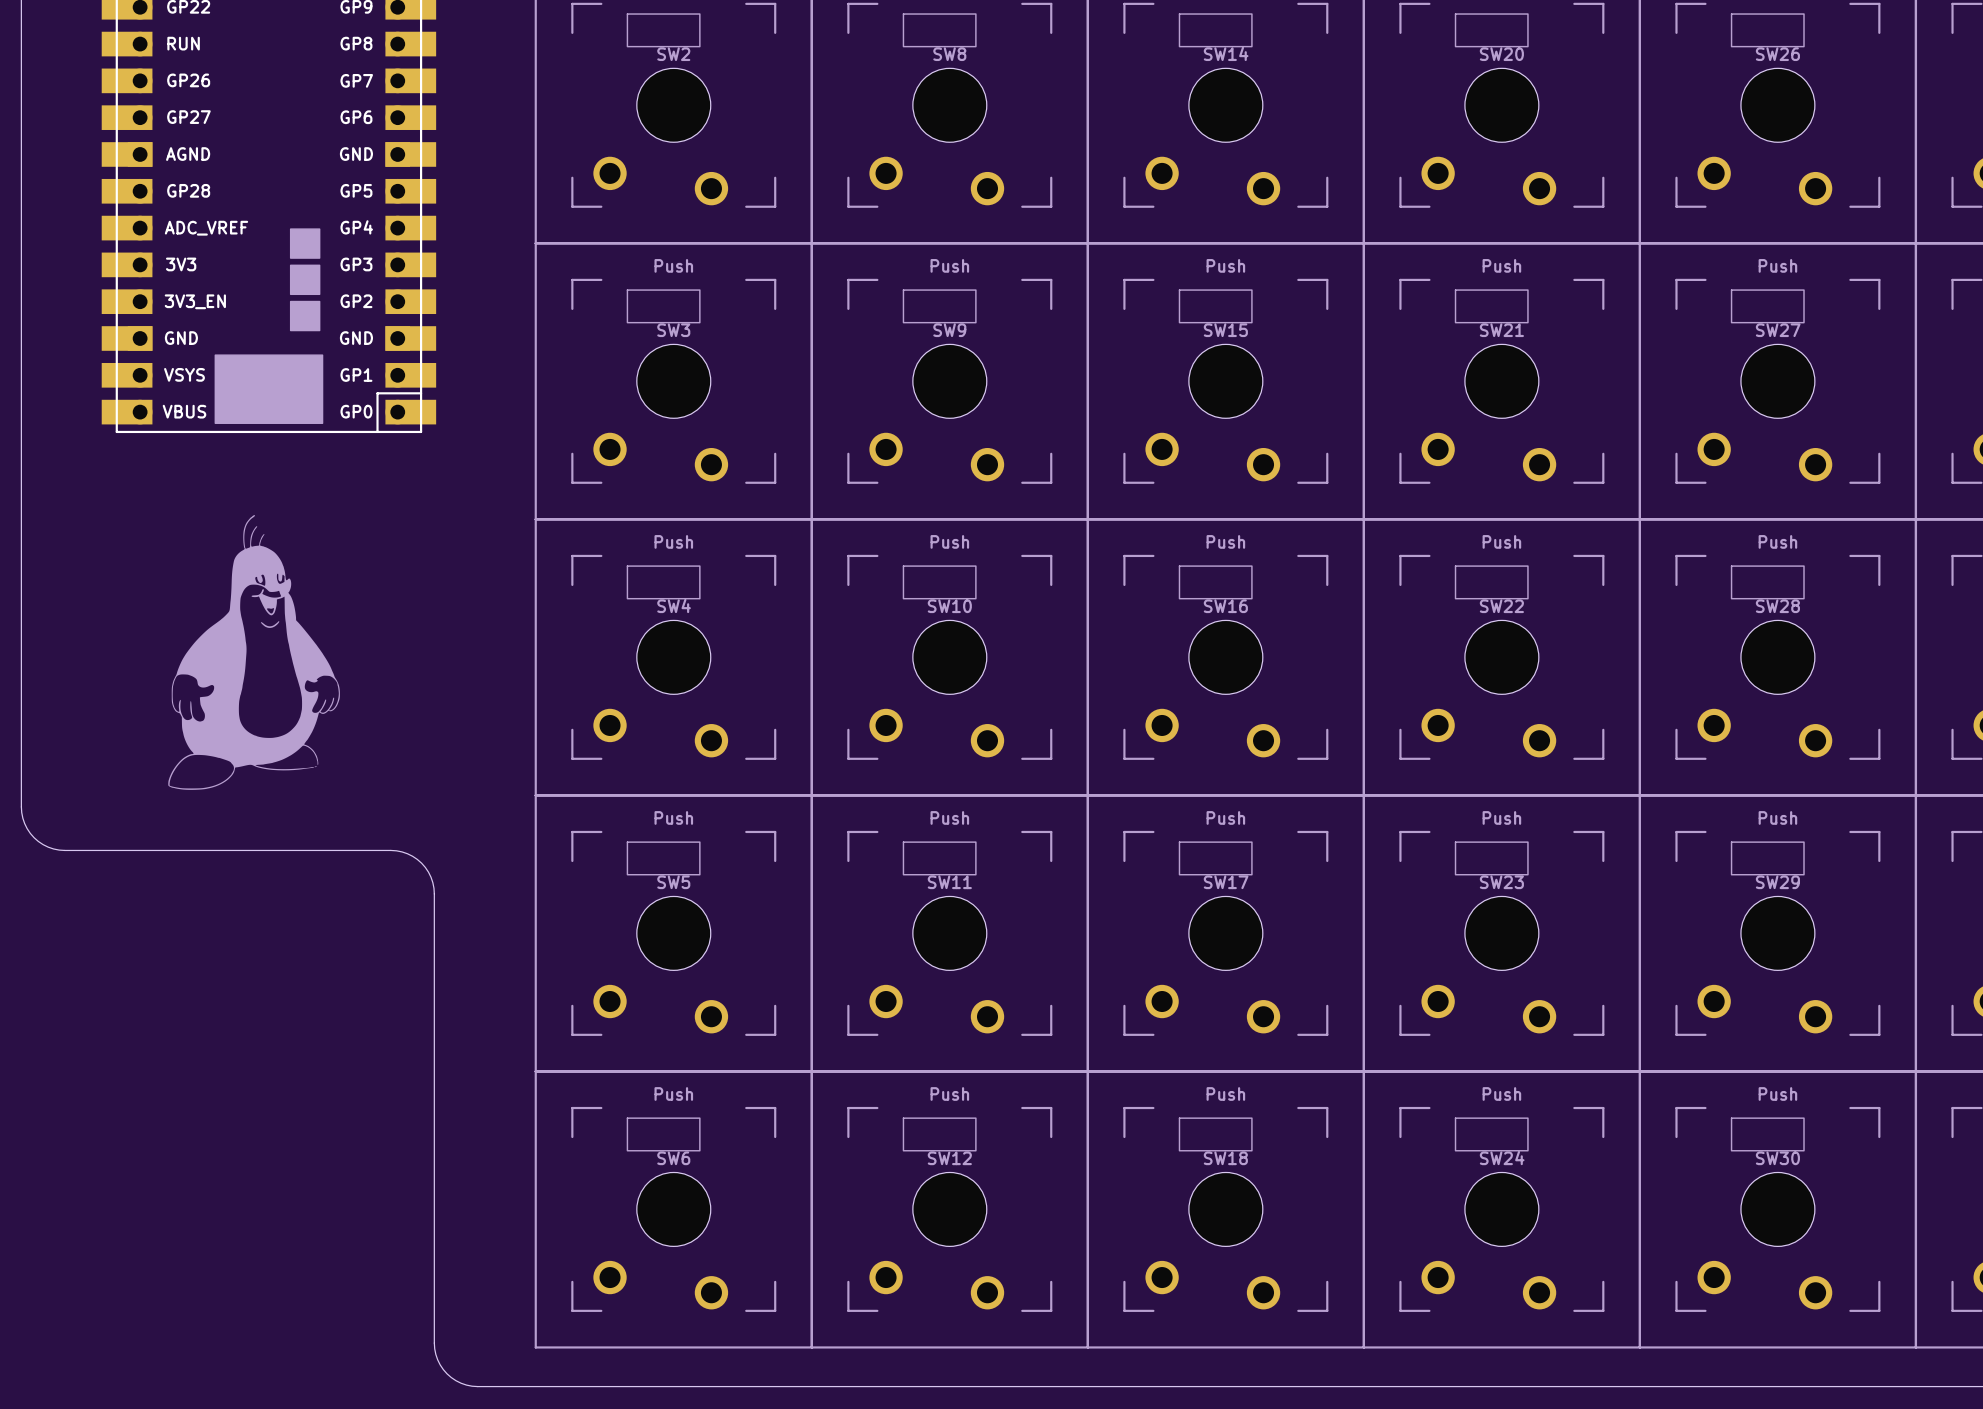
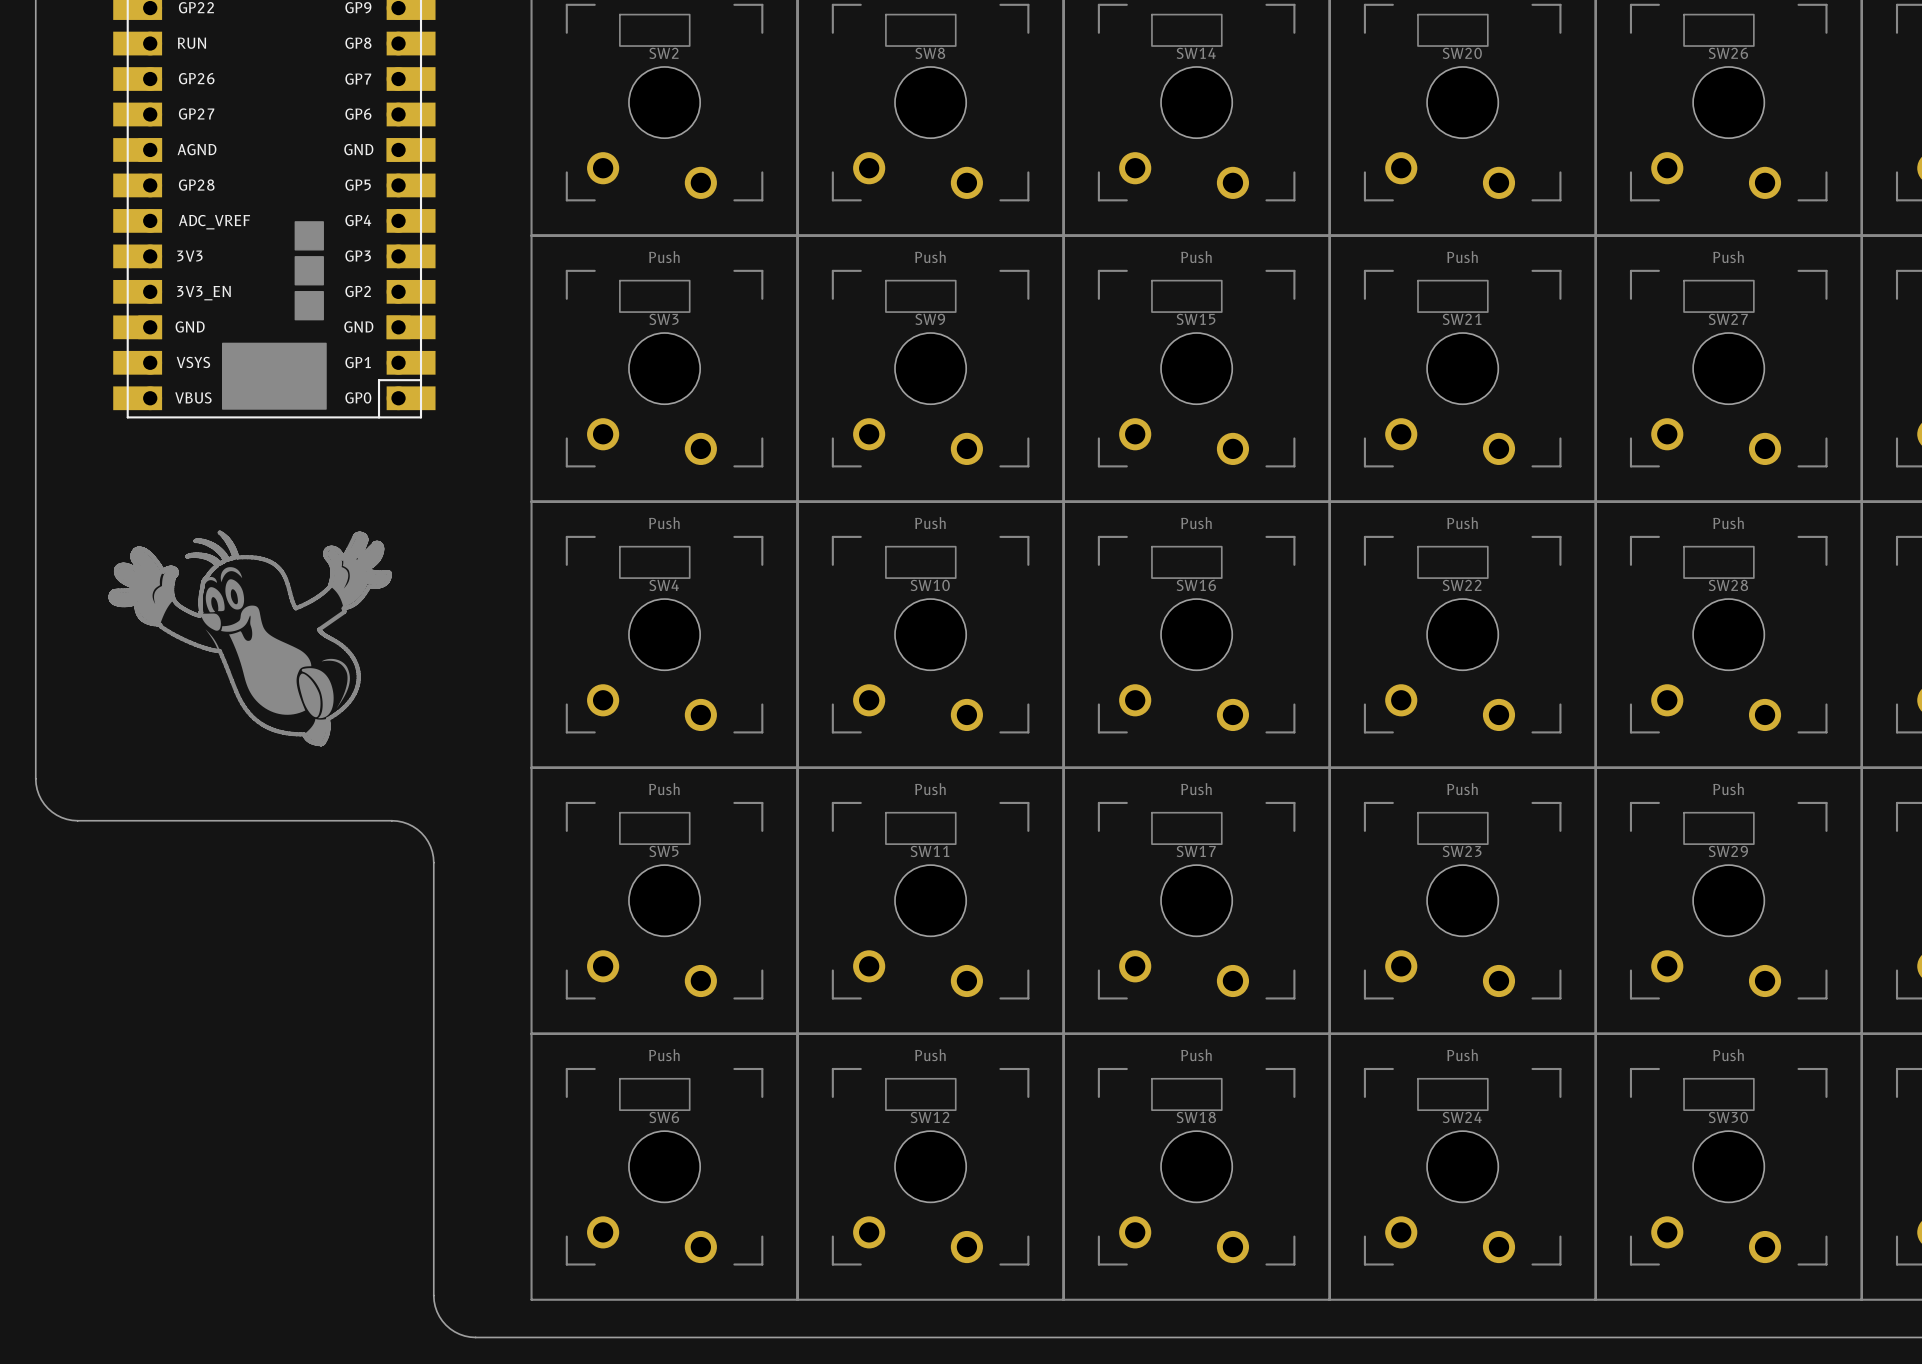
drawing: [168, 515, 340, 790] -> none
drawing: none -> [201, 535, 389, 719]
drawing: none -> [112, 550, 175, 624]
line: none -> (370, 567) (379, 557) (382, 547) (379, 543) (375, 543) (359, 556) (366, 540) (363, 534) (355, 535) (342, 558) (337, 549) (328, 548) (325, 555) (330, 564) (332, 571) (329, 587) (314, 599) (295, 608) (285, 577) (278, 567) (263, 559) (237, 557) (230, 541) (225, 536) (219, 532) (228, 543) (234, 557) (227, 559) (216, 546) (199, 540) (195, 541) (212, 546) (220, 553) (224, 560) (219, 563) (212, 557) (201, 554) (191, 554) (187, 556) (203, 557) (217, 565) (203, 582) (200, 598) (201, 612)
line: none -> (176, 570) (170, 567) (163, 571) (149, 553) (138, 548) (133, 551) (132, 557) (141, 571)
line: none -> (369, 571) (387, 572)
line: none -> (140, 572) (126, 564) (120, 565) (116, 568) (116, 573) (118, 578) (133, 586)
line: none -> (389, 575) (385, 583) (378, 586) (369, 586) (356, 602) (343, 608) (344, 612) (318, 629) (348, 651) (356, 663) (358, 674) (356, 688) (351, 699) (341, 709) (327, 719) (328, 731) (323, 742)
line: none -> (174, 576) (172, 591) (175, 601) (189, 611) (200, 614)
line: none -> (133, 589) (113, 591) (110, 594) (111, 600) (120, 604) (135, 603) (138, 614) (145, 621) (160, 624) (173, 634) (194, 644) (219, 650) (240, 699) (254, 718) (271, 729) (286, 733) (304, 734) (309, 741) (320, 744)
drawing shape: [314, 766, 317, 768] -> [305, 718, 327, 743]

